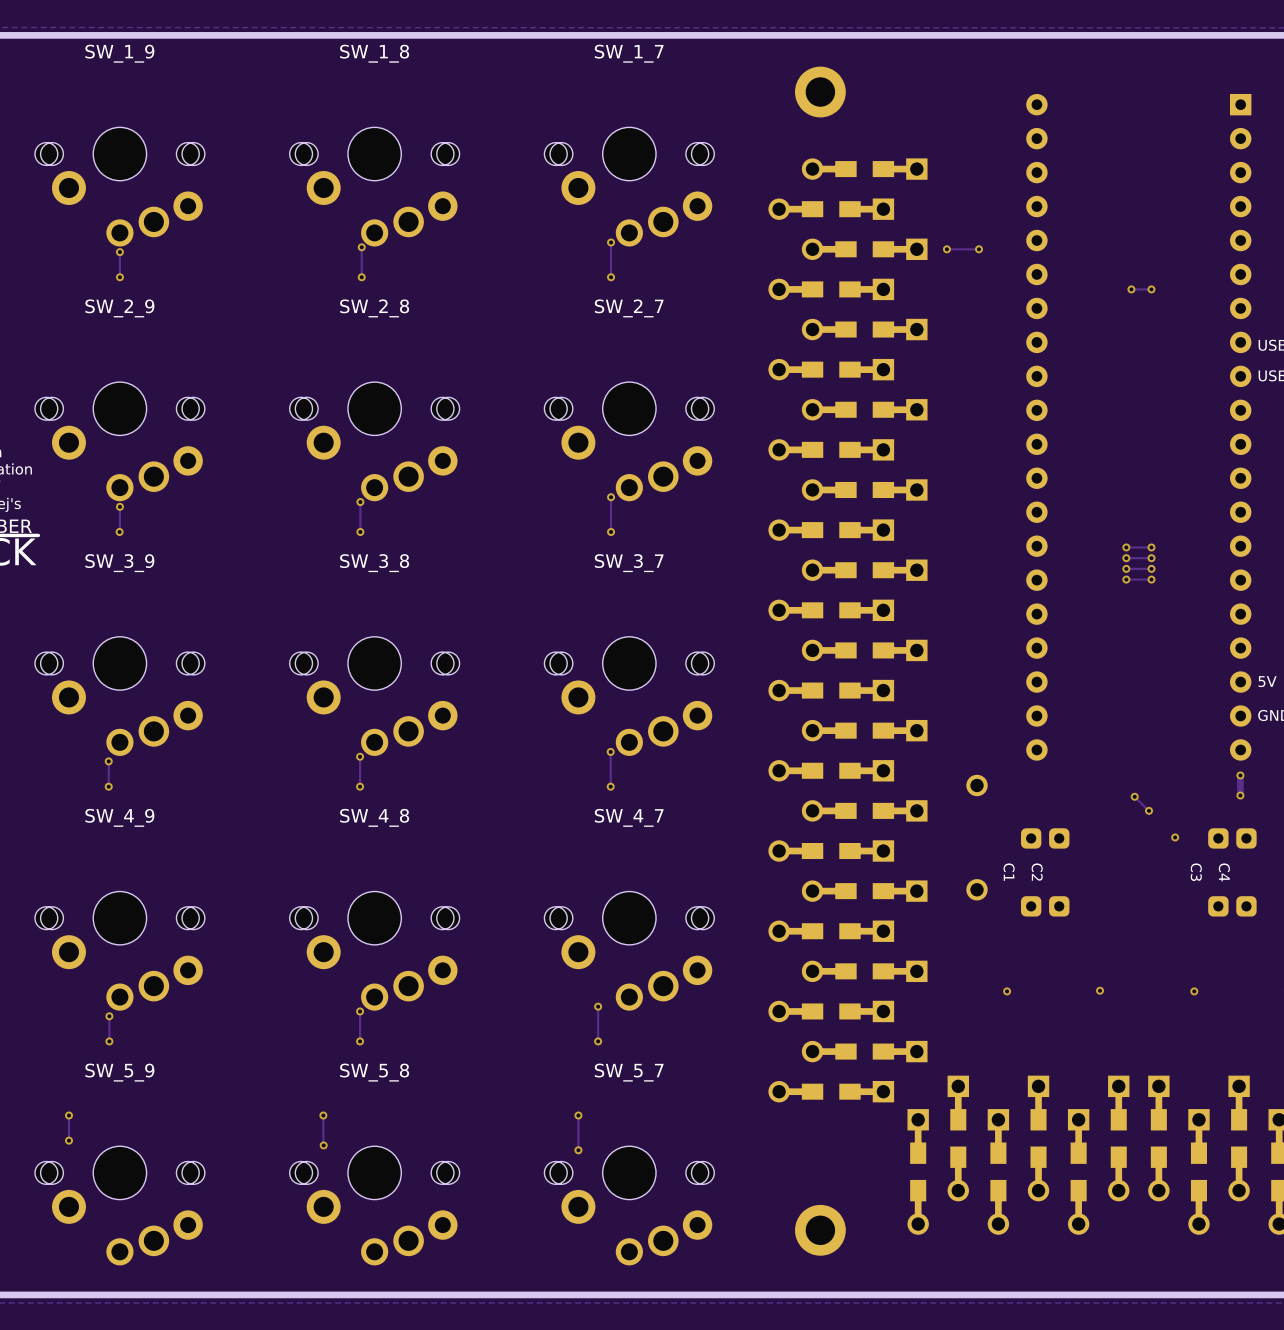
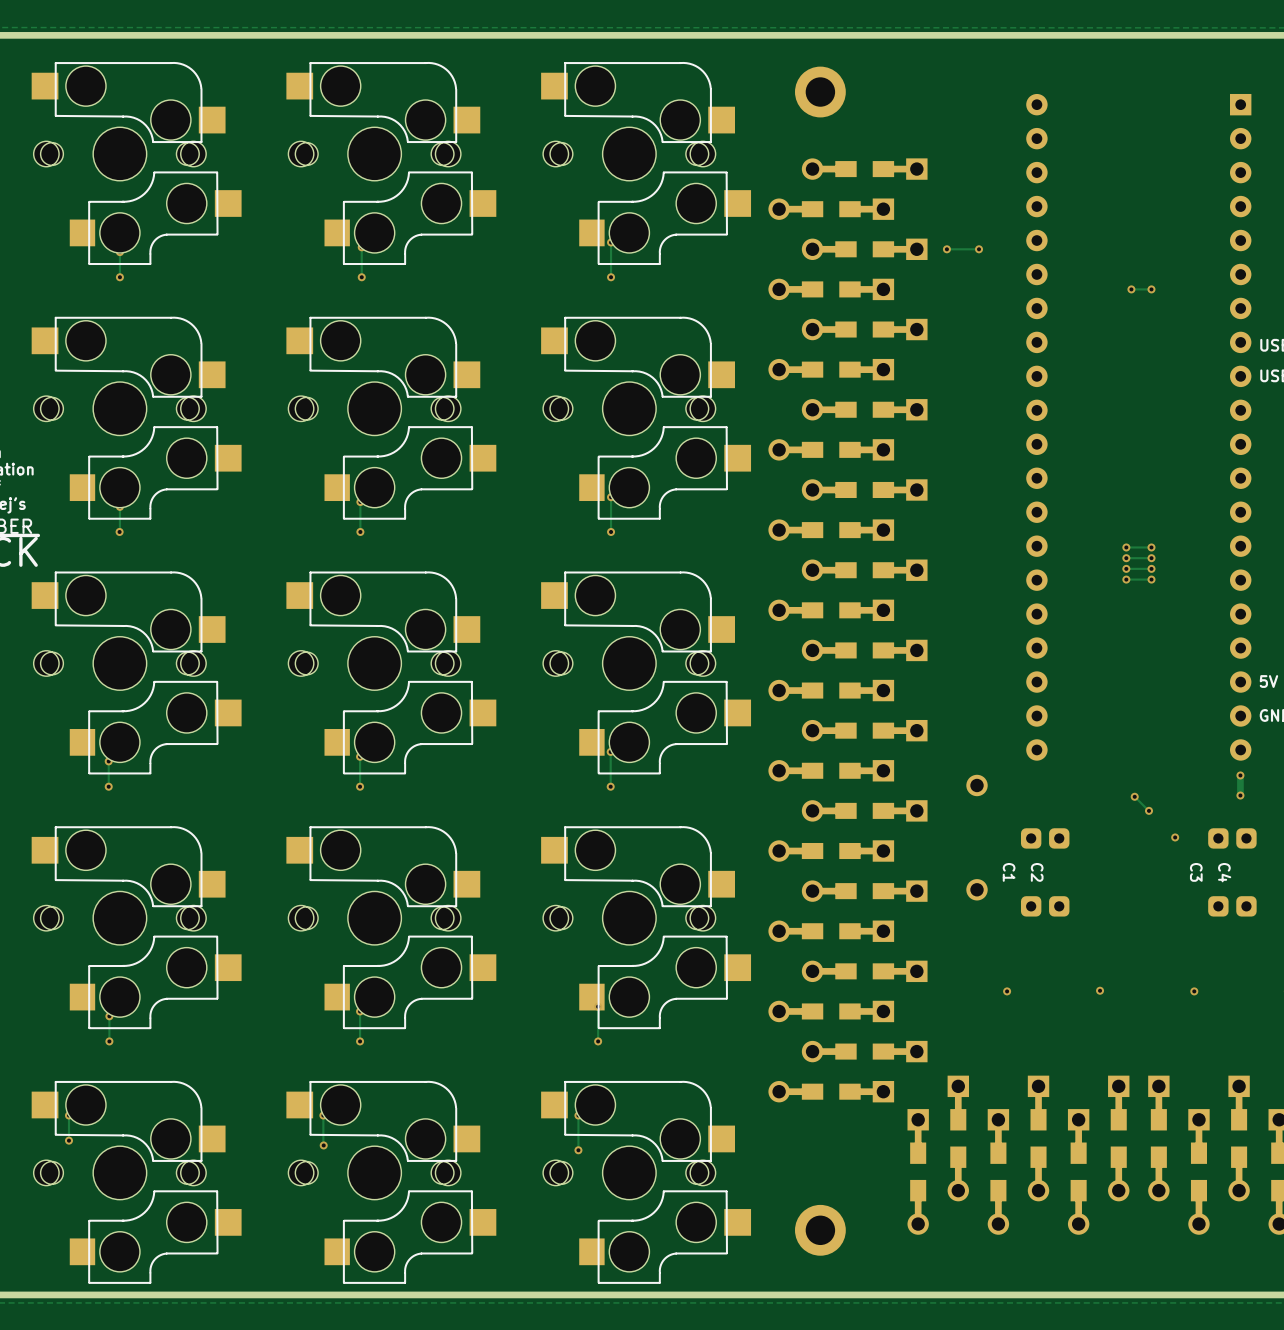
part: none -> (136, 163)
part: none -> (391, 163)
part: none -> (646, 163)
SW_1_9: (119, 186) -> none
SW_1_8: (374, 186) -> none
SW_1_7: (629, 186) -> none
part: none -> (136, 418)
part: none -> (391, 418)
part: none -> (646, 418)
SW_2_9: (119, 441) -> none
SW_2_8: (374, 441) -> none
SW_2_7: (629, 441) -> none
part: none -> (136, 672)
part: none -> (391, 672)
part: none -> (646, 672)
SW_3_9: (119, 696) -> none
SW_3_8: (374, 696) -> none
SW_3_7: (629, 696) -> none
part: none -> (136, 927)
part: none -> (391, 927)
part: none -> (646, 927)
SW_4_9: (119, 951) -> none
SW_4_8: (374, 951) -> none
SW_4_7: (629, 951) -> none
part: none -> (136, 1182)
part: none -> (391, 1182)
part: none -> (646, 1182)
SW_5_9: (119, 1205) -> none
SW_5_8: (374, 1205) -> none
SW_5_7: (629, 1205) -> none

